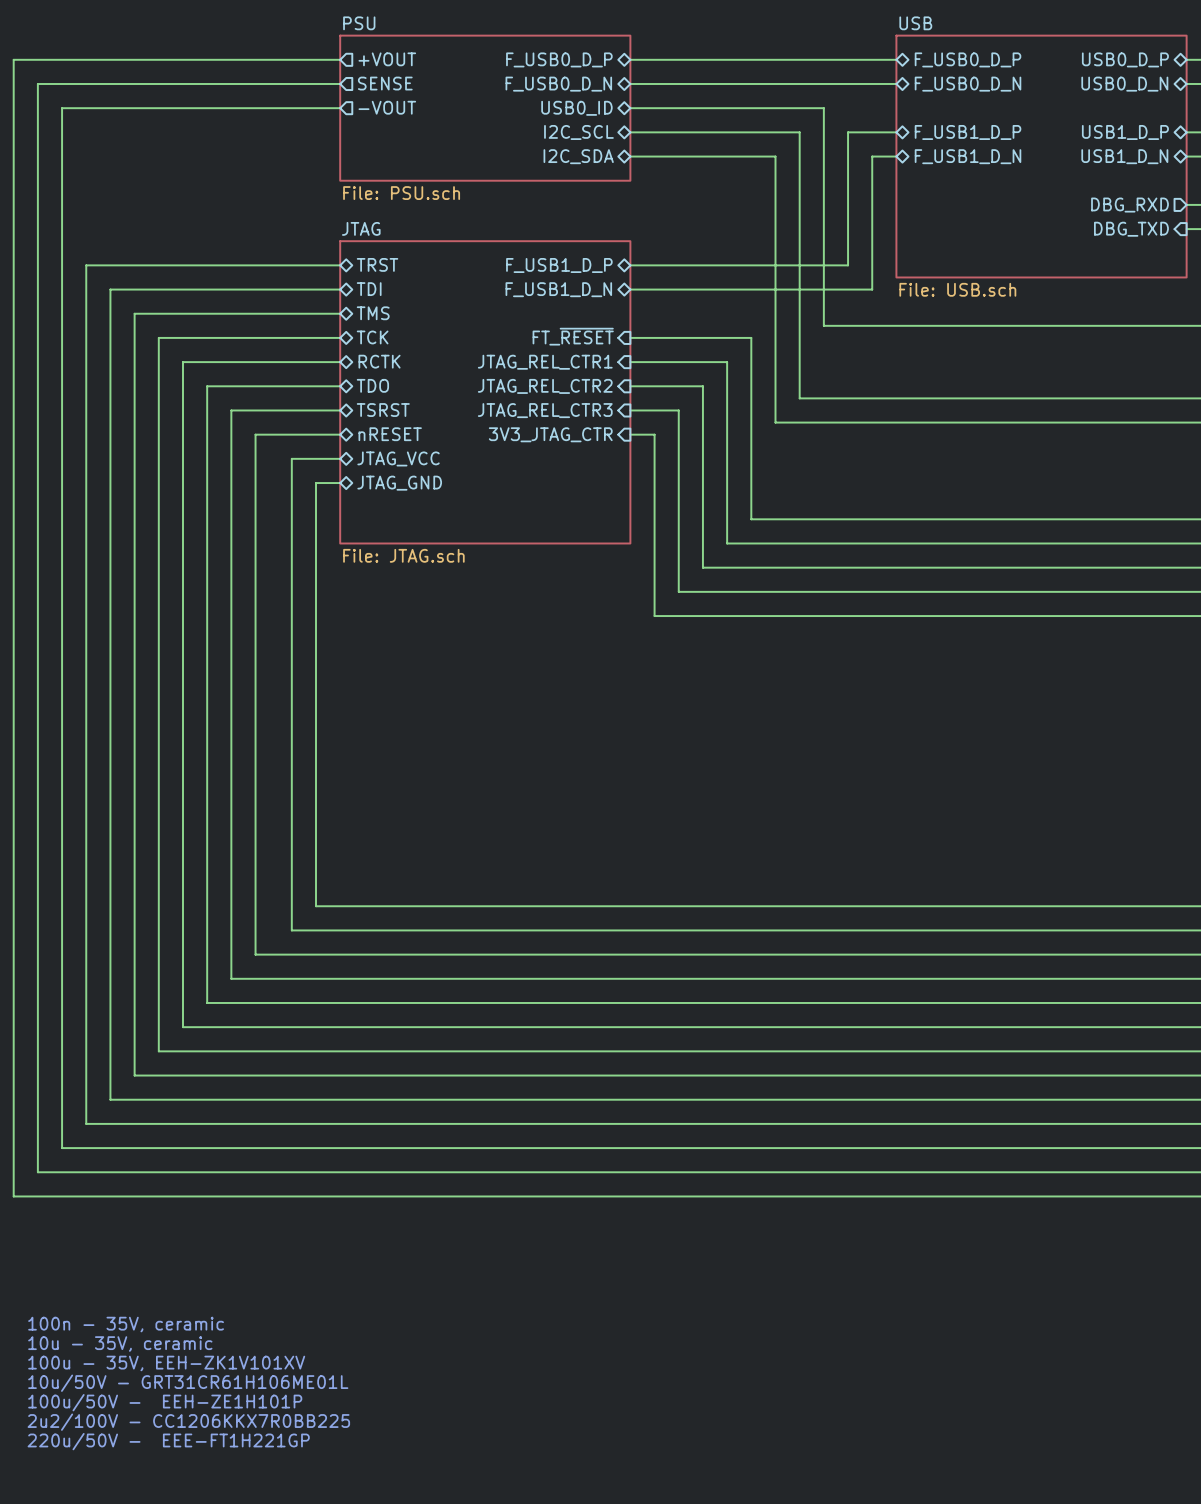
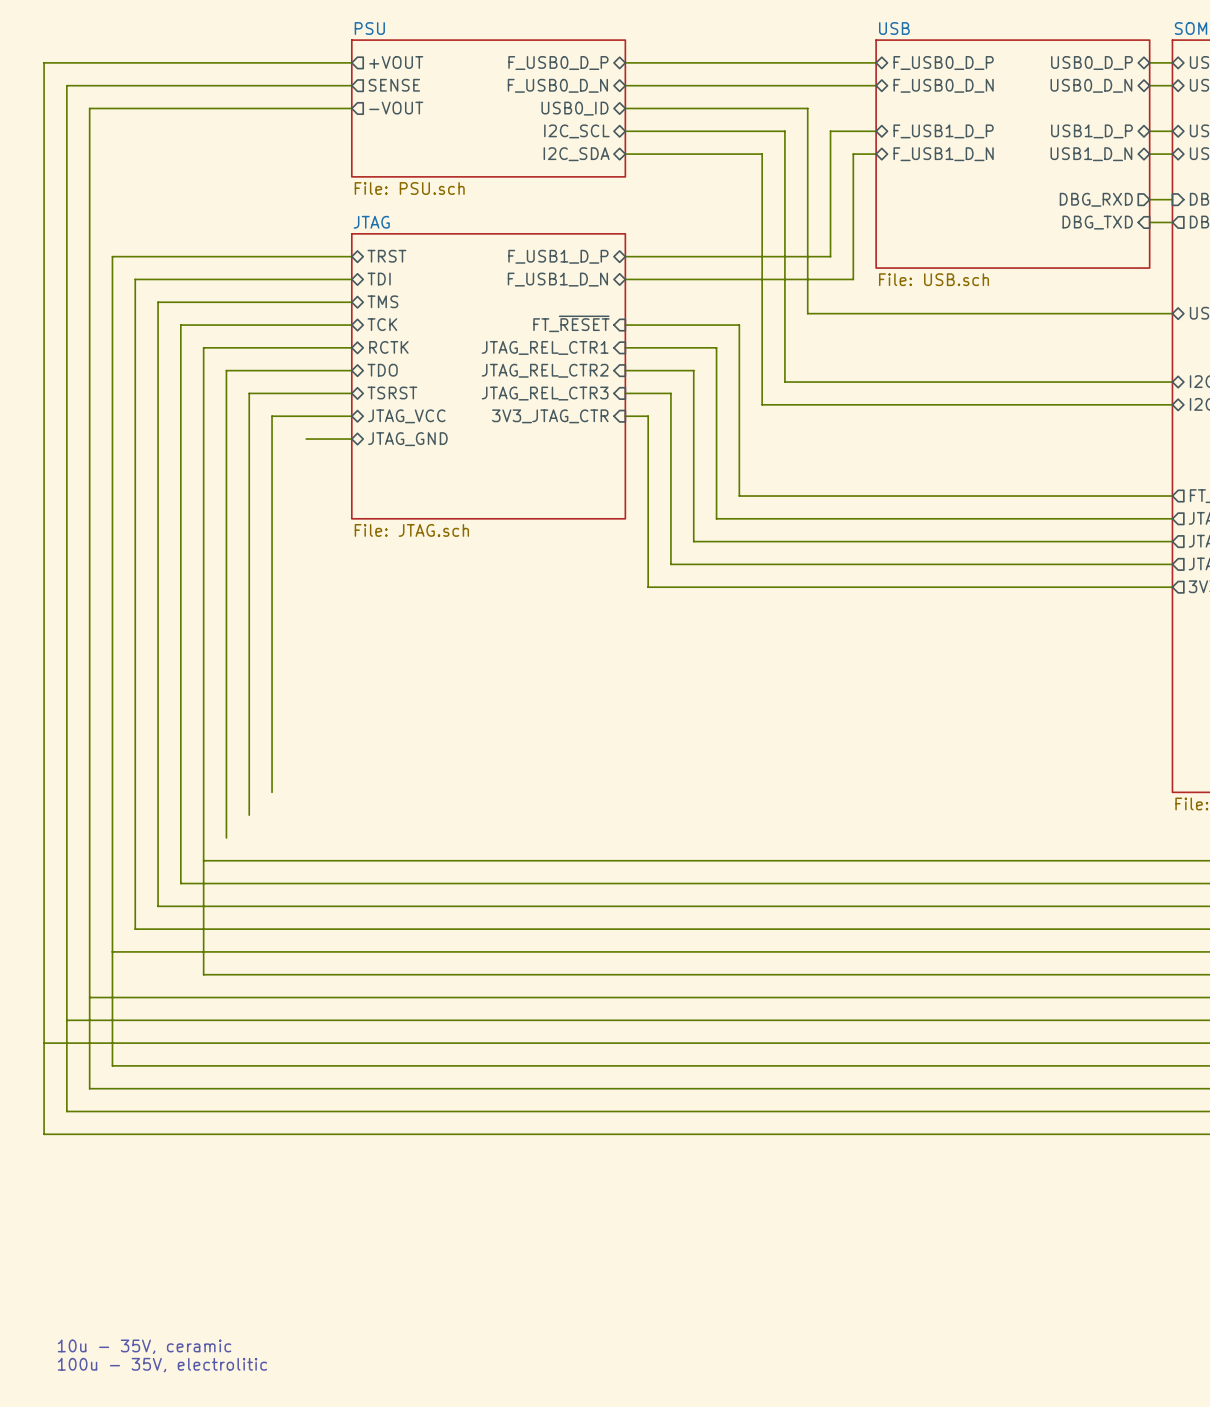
sheet pin: nRESET (390, 434) -> JTAG_VCC (406, 416)
wire: (291, 458) (291, 930) -> (180, 883) (306, 883)
sheet pin: JTAG_VCC (398, 458) -> JTAG_GND (407, 439)
wire: (340, 483) (316, 483) (316, 906) -> (203, 860) (329, 860)
sheet pin: JTAG_GND (399, 483) -> none
wire: (255, 833) (255, 954) -> (158, 906) (272, 906)
wire: (231, 857) (231, 978) -> (135, 929) (249, 929)
wire: (207, 882) (207, 1002) -> (112, 951) (226, 951)
wire: (158, 930) (158, 1051) -> (89, 997) (180, 997)
wire: (134, 954) (134, 1075) -> (66, 1020) (158, 1020)
wire: (110, 978) (110, 1099) -> (44, 1043) (135, 1043)
text: 100n - 35V, ceramic (126, 1324) -> none
text: 10u - 35V, ceramic (120, 1344) -> none
text: 100u - 35V, EEH-ZK1V101XV (166, 1363) -> none
text: 10u/50V - GRT31CR61H106ME01L (188, 1383) -> none
text: 100u/50V - EEH-ZE1H101P (165, 1402) -> none
text: 2u2/100V - CC1206KKX7R0BB225 (188, 1422) -> 10u - 35V, ceramic (144, 1346)
text: 220u/50V - EEE-FT1H221GP (168, 1441) -> 100u - 35V, electrolitic (162, 1365)

